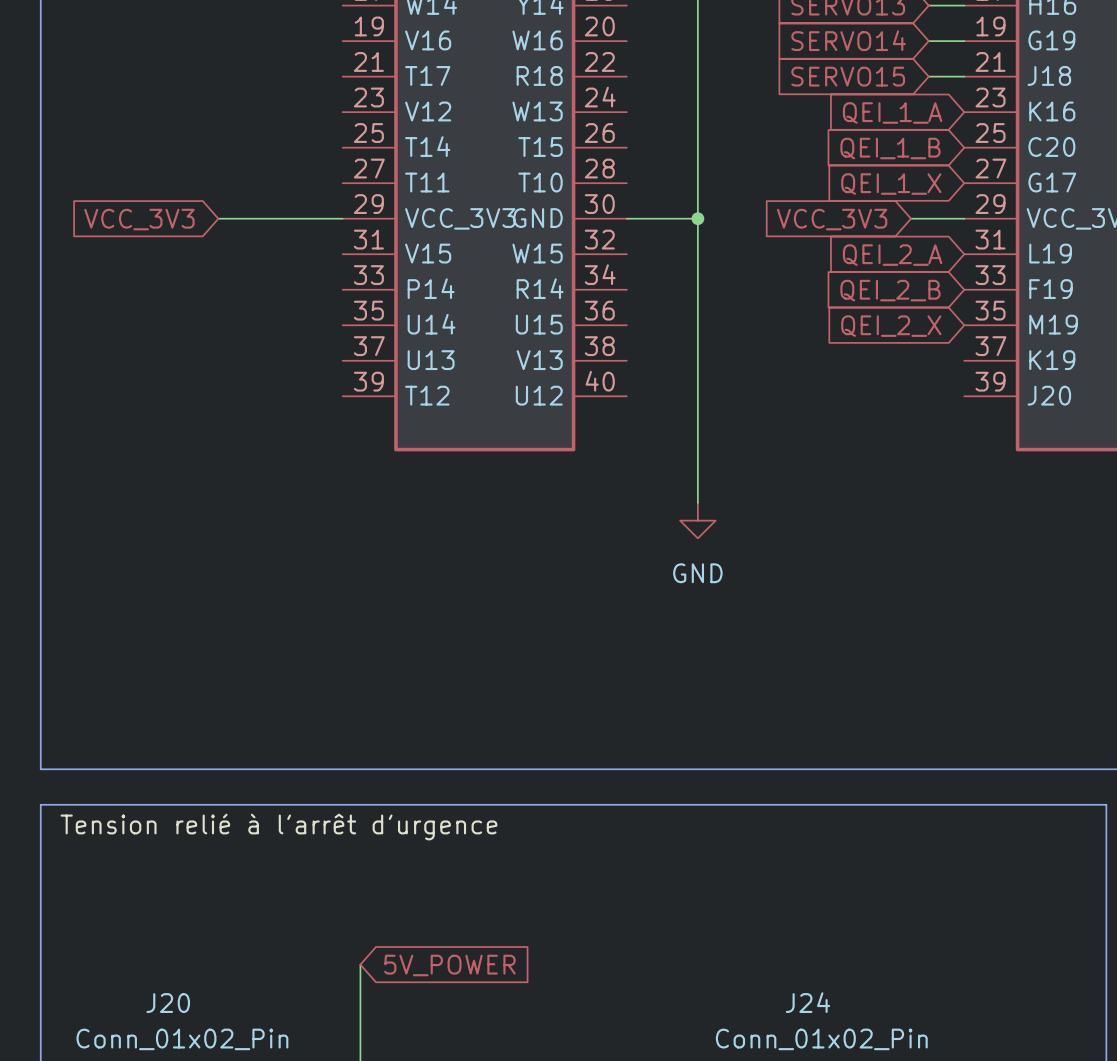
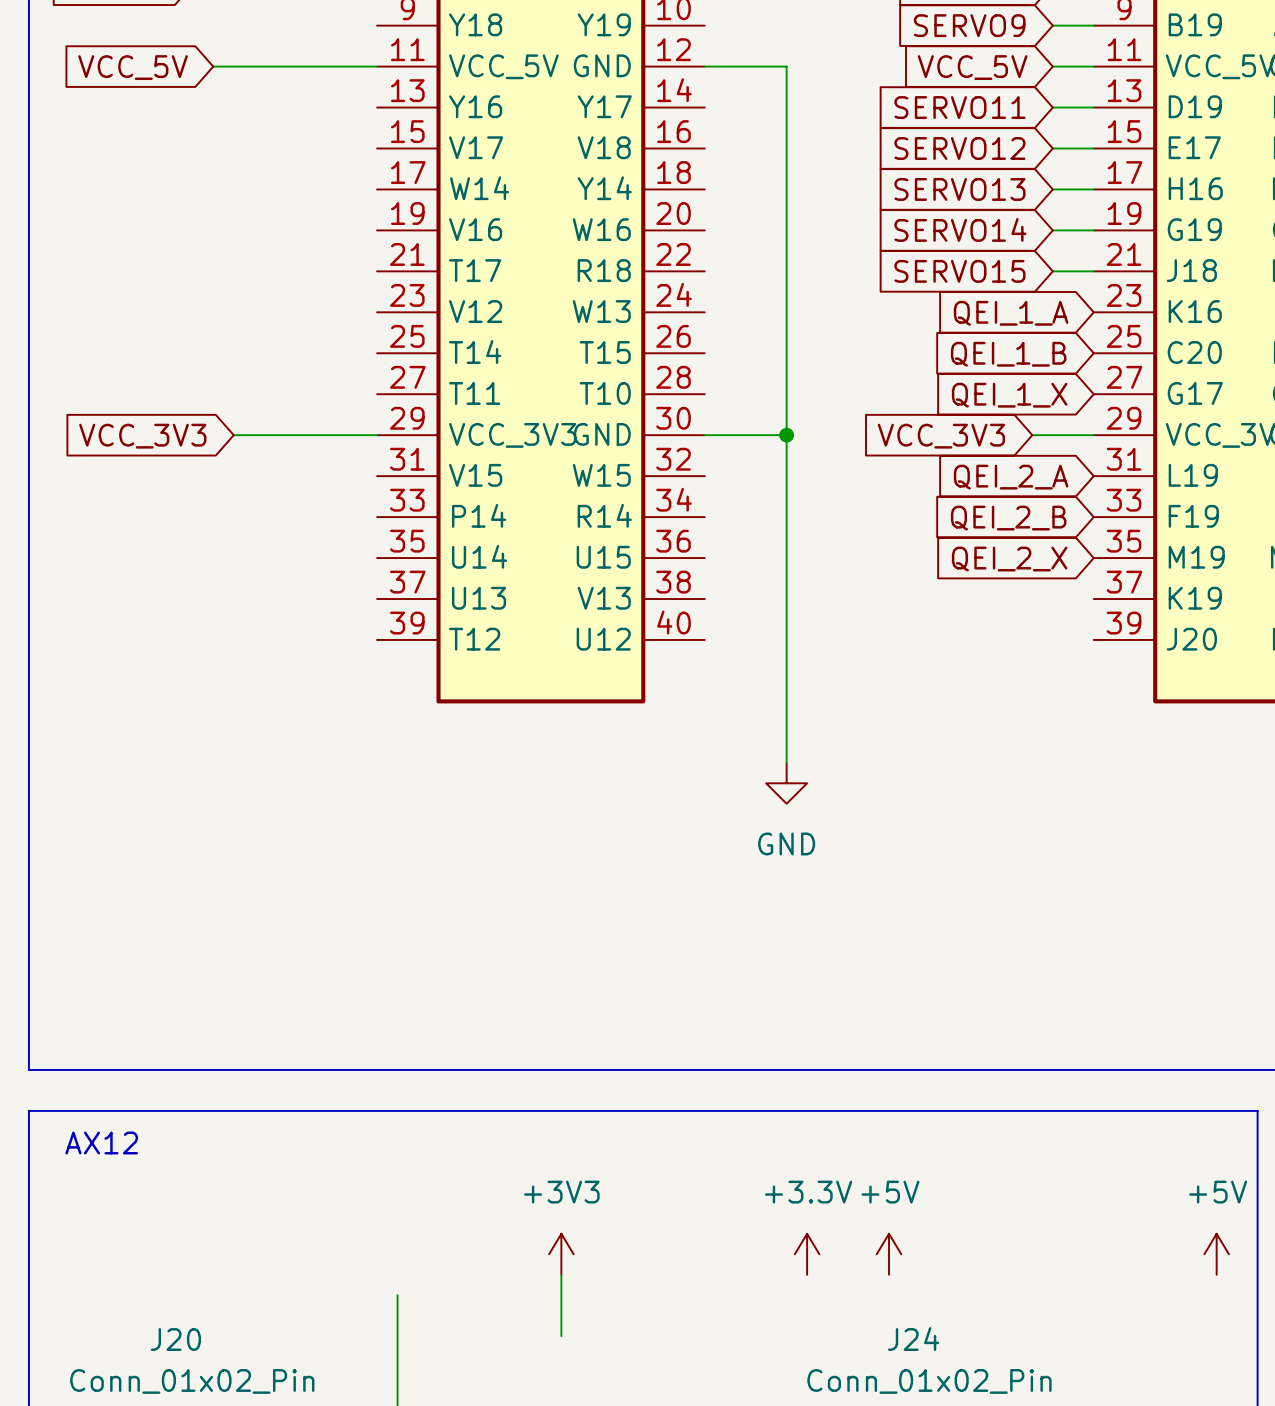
label: Tension relié à l'arrêt d'urgence (278, 827) -> none
text: none -> AX12 (101, 1143)
power symbol: none -> +3V3 (561, 1254)
power symbol: none -> +3.3V (807, 1254)
power symbol: none -> +5V (889, 1254)
power symbol: none -> +5V (1216, 1254)
wire: none -> (561, 1274) (561, 1336)
global label: 5V_POWER (449, 965) -> none

